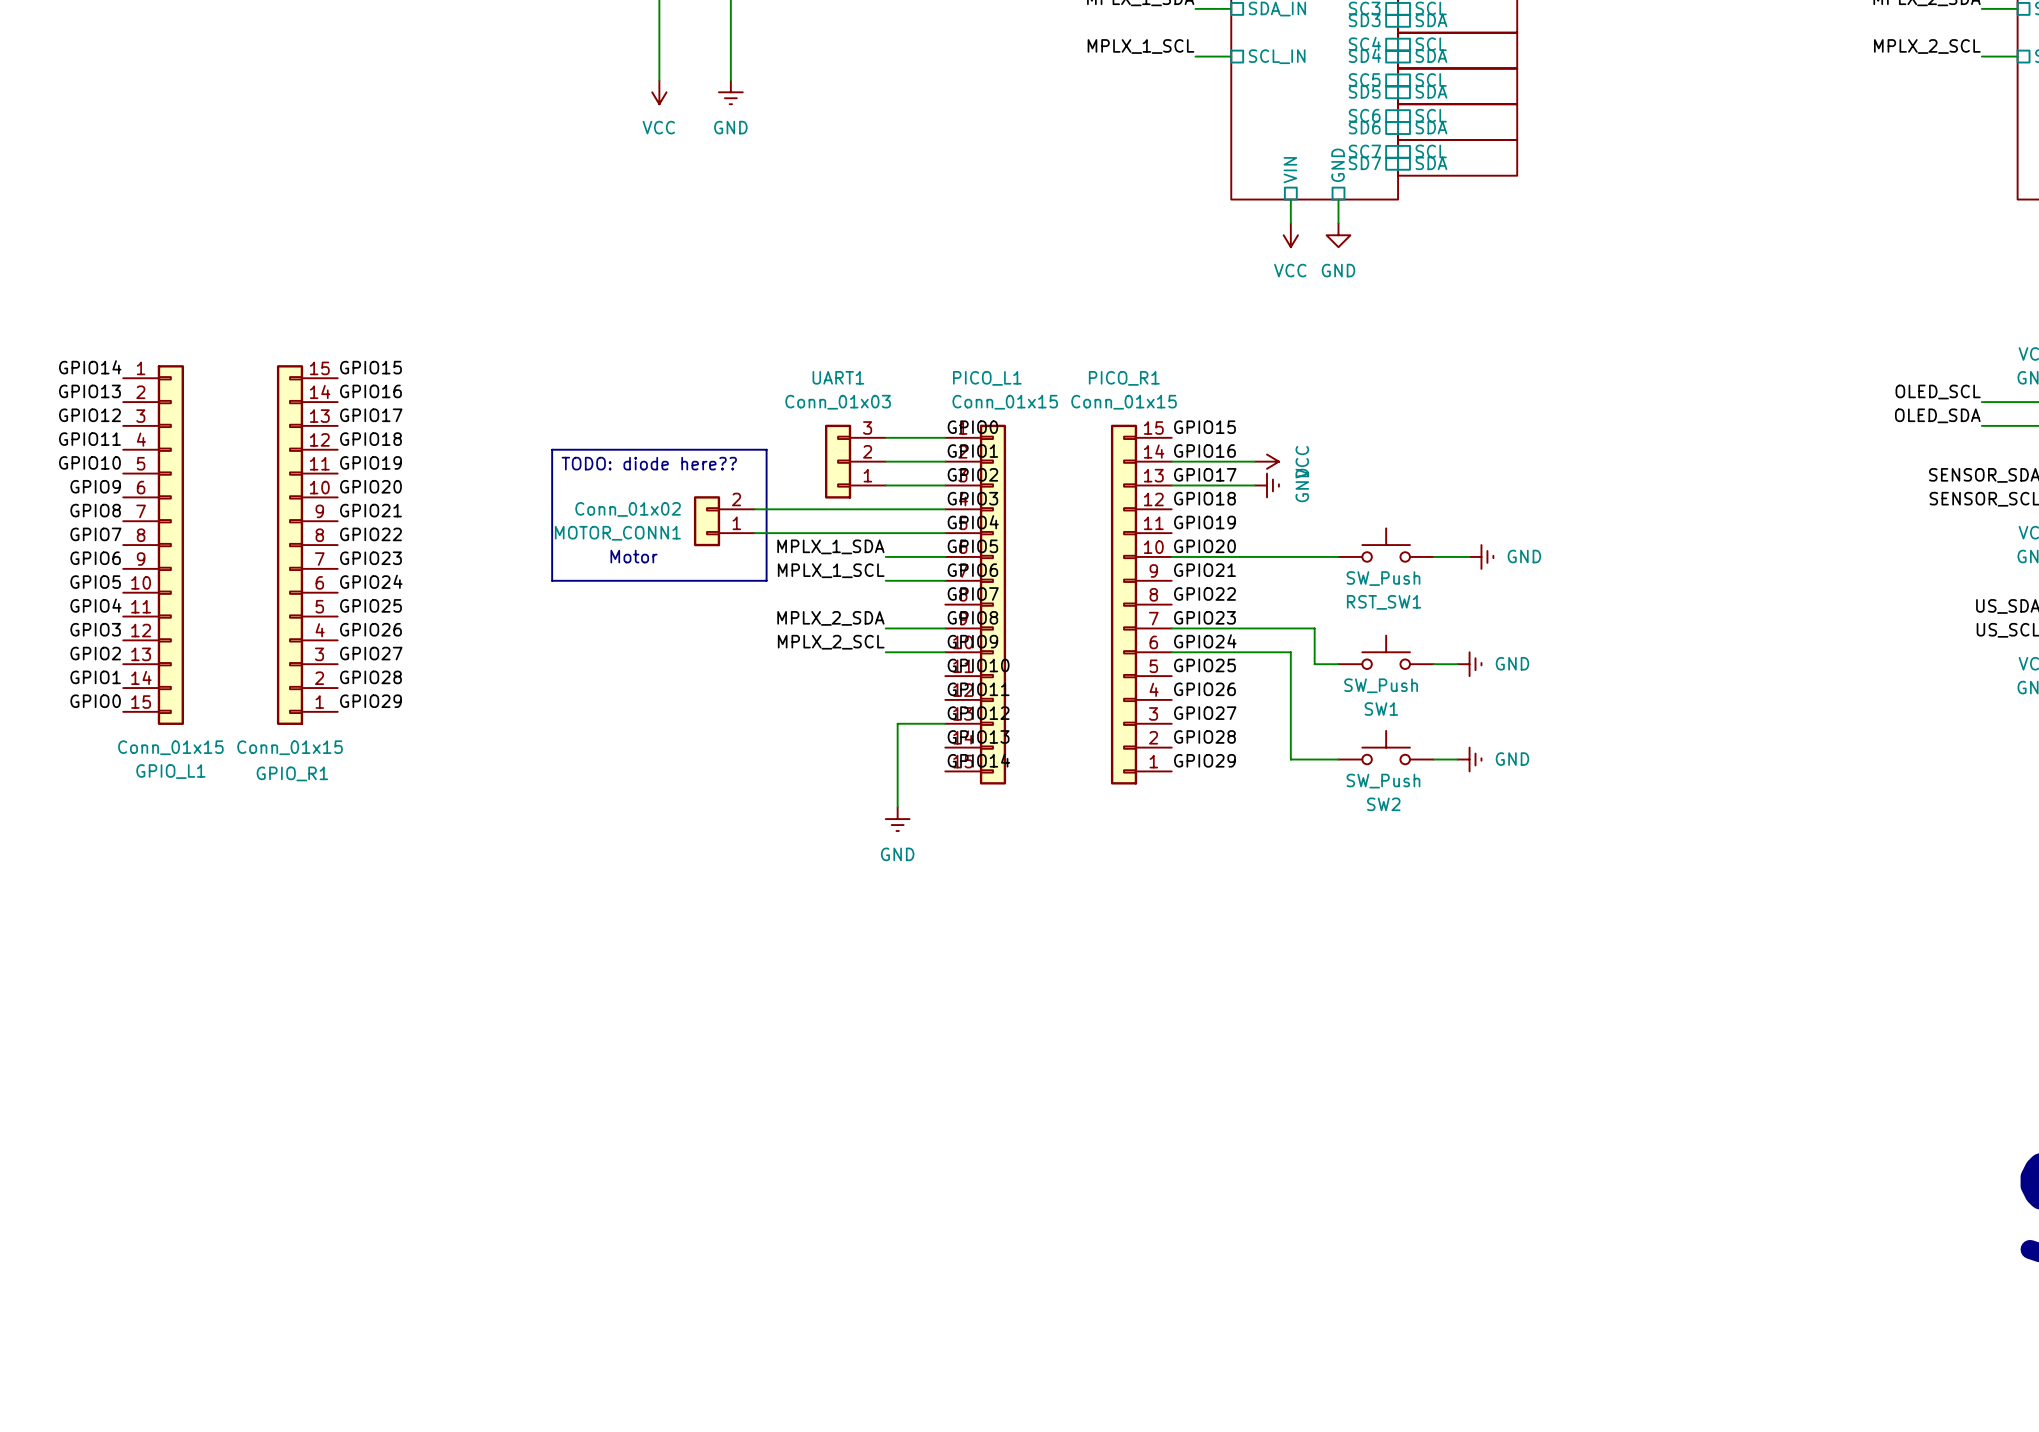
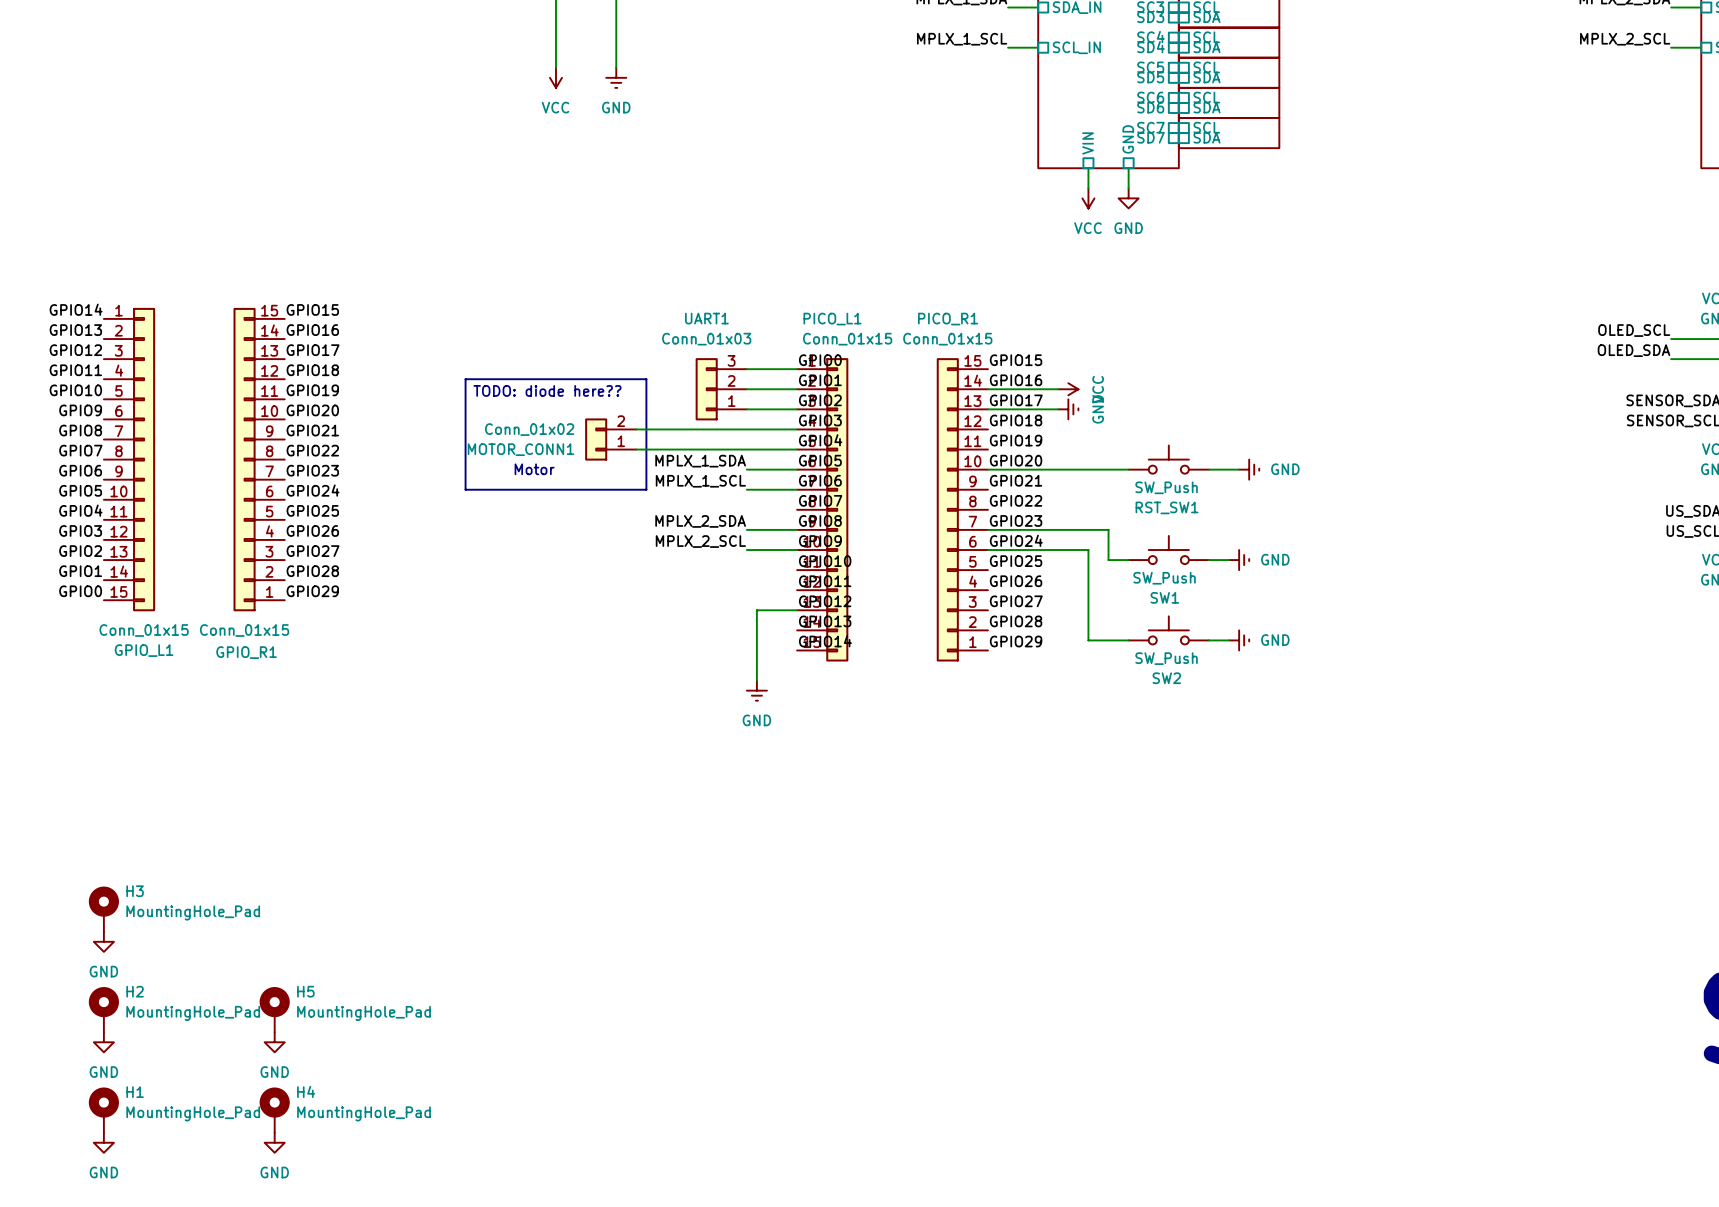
H3: none -> MountingHole_Pad (103, 909)
power symbol: none -> GND (103, 941)
H2: none -> MountingHole_Pad (103, 1009)
H5: none -> MountingHole_Pad (274, 1009)
power symbol: none -> GND (103, 1042)
power symbol: none -> GND (274, 1042)
H1: none -> MountingHole_Pad (103, 1110)
H4: none -> MountingHole_Pad (274, 1110)
power symbol: none -> GND (103, 1142)
power symbol: none -> GND (274, 1142)

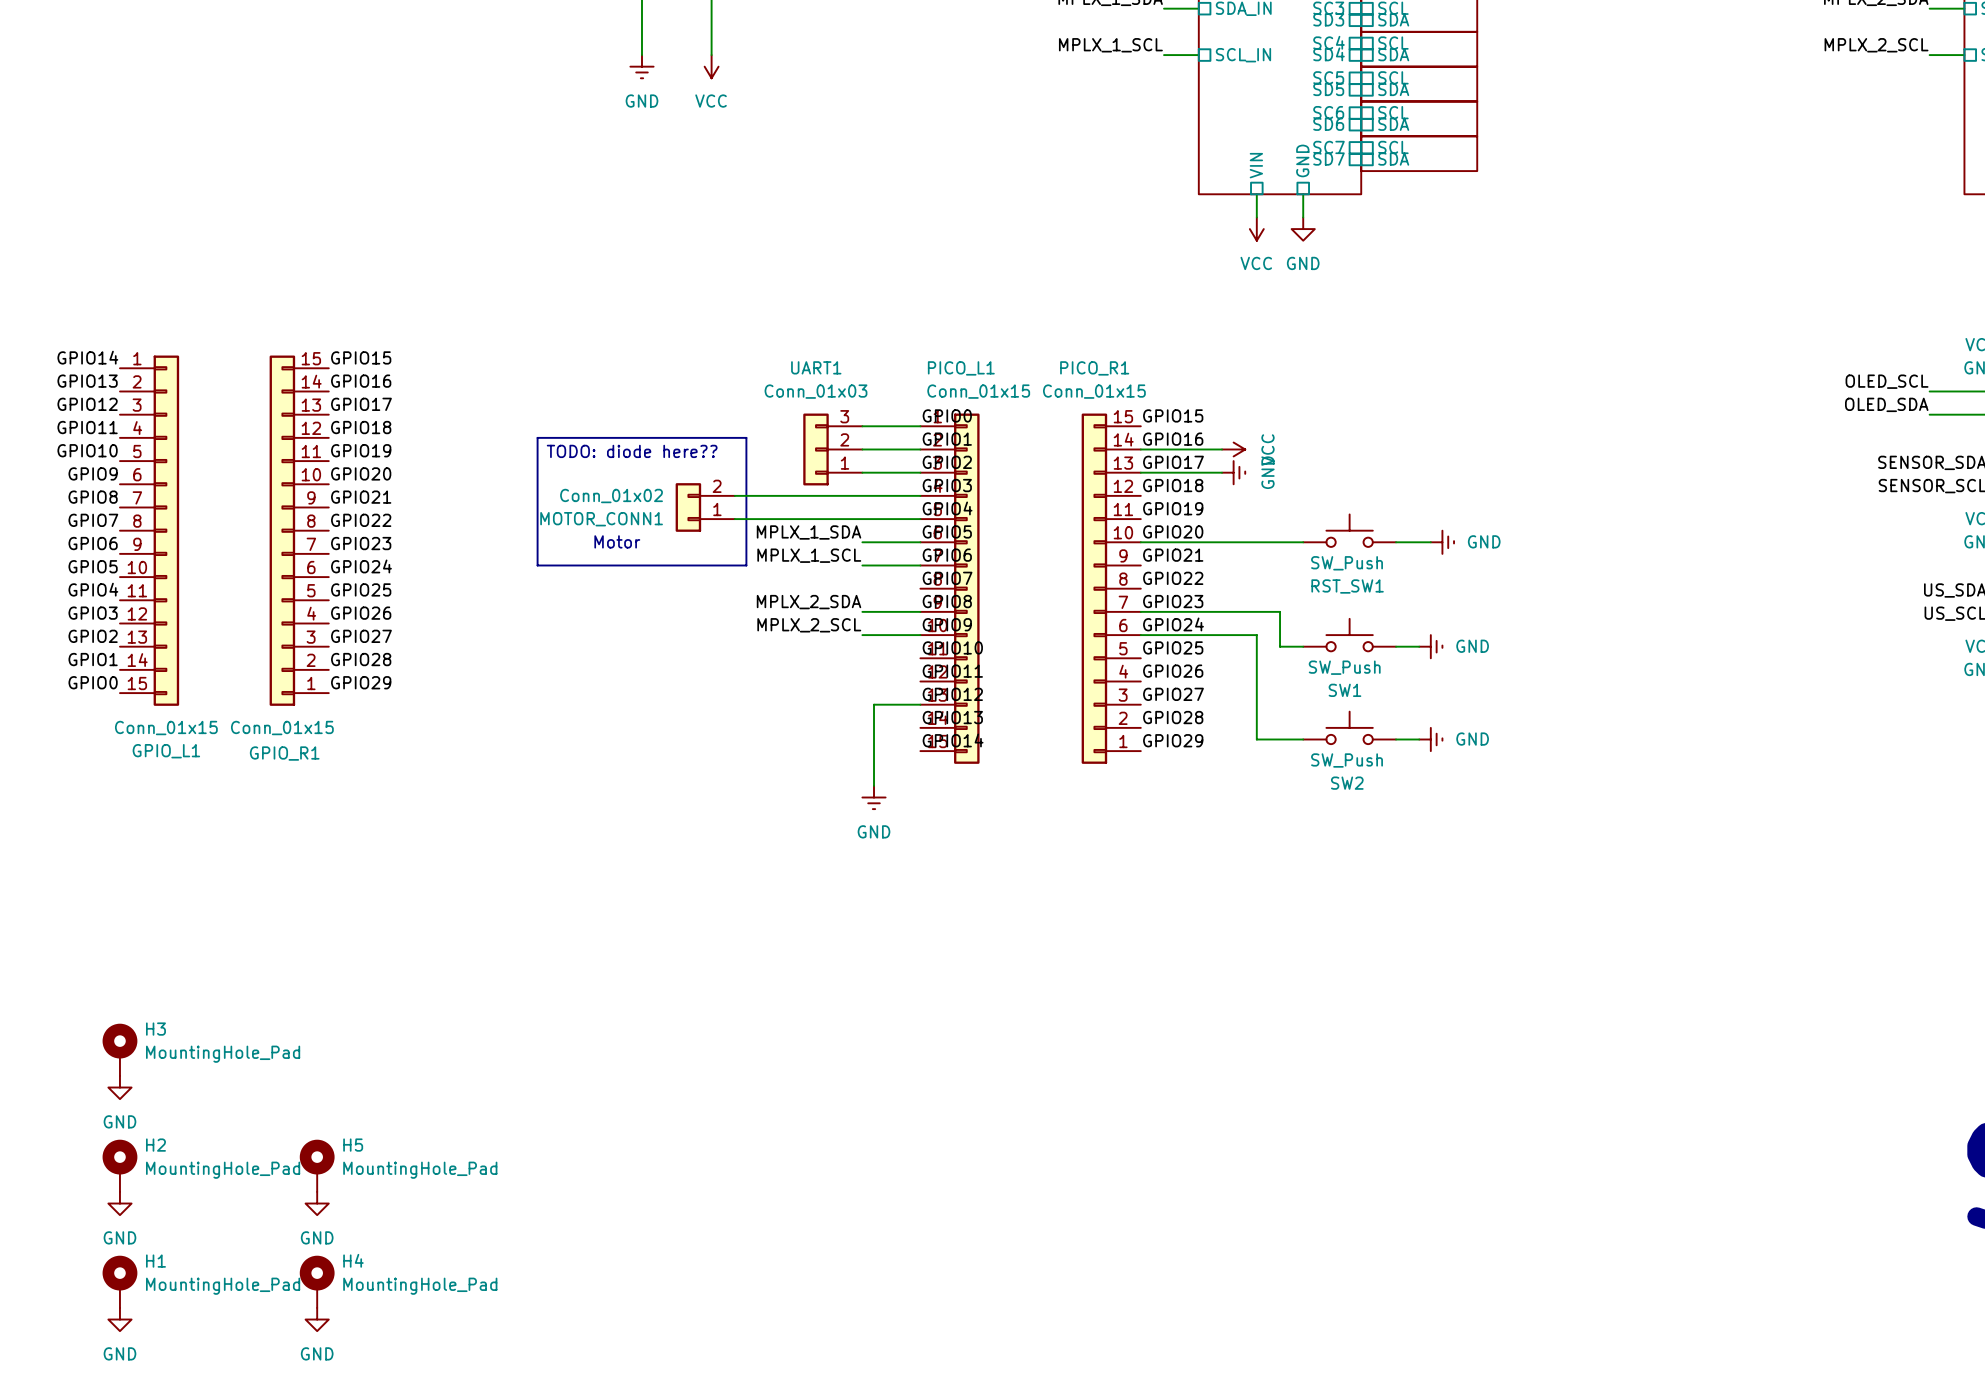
power symbol position: VCC (555, 77) -> VCC (711, 66)
power symbol position: GND (616, 77) -> GND (641, 66)

